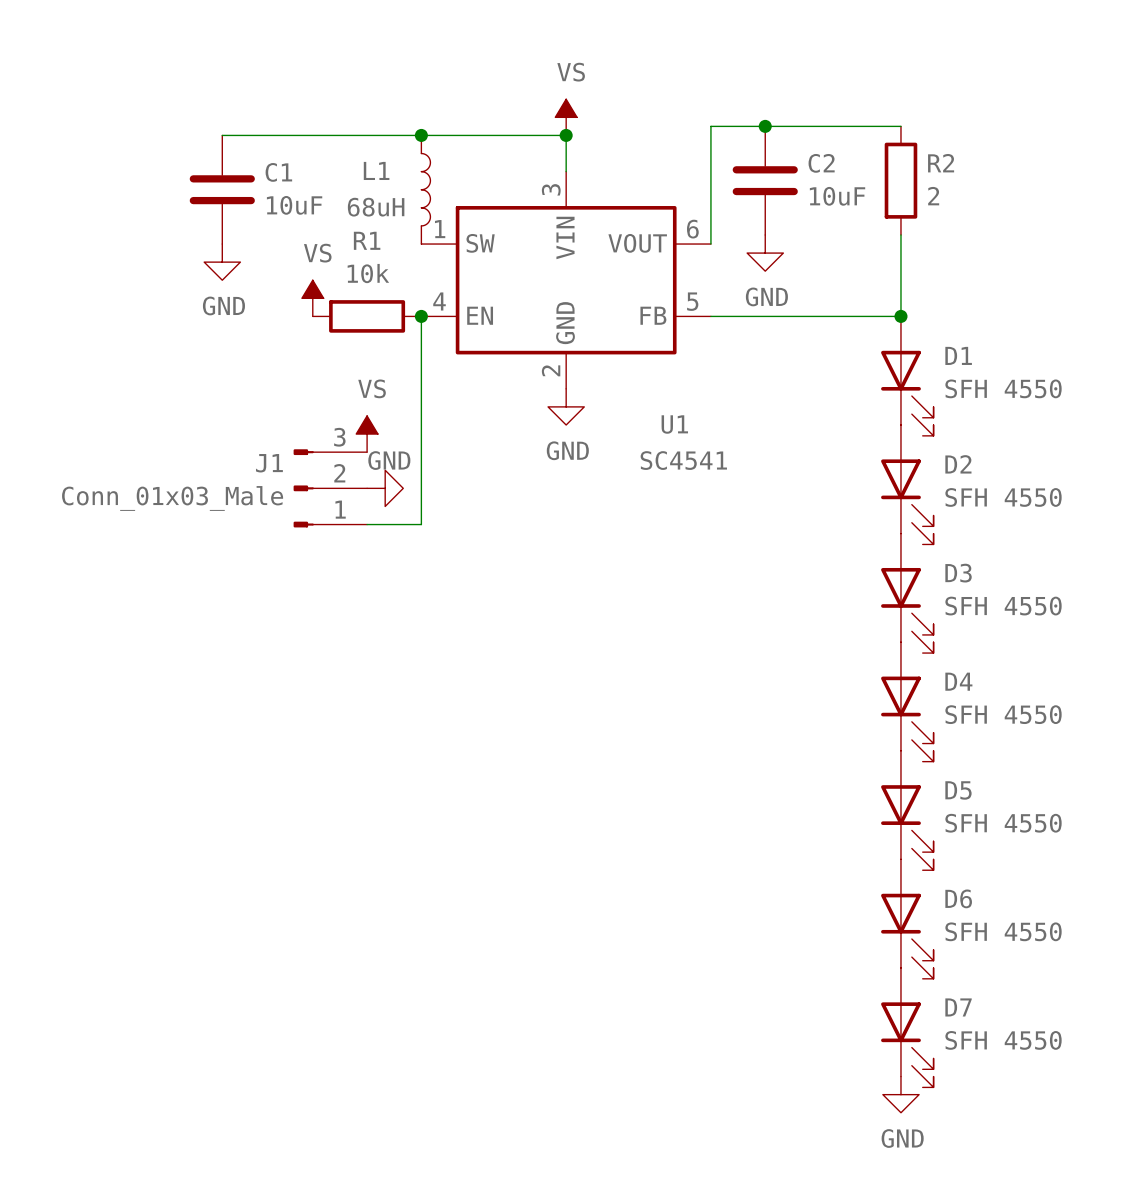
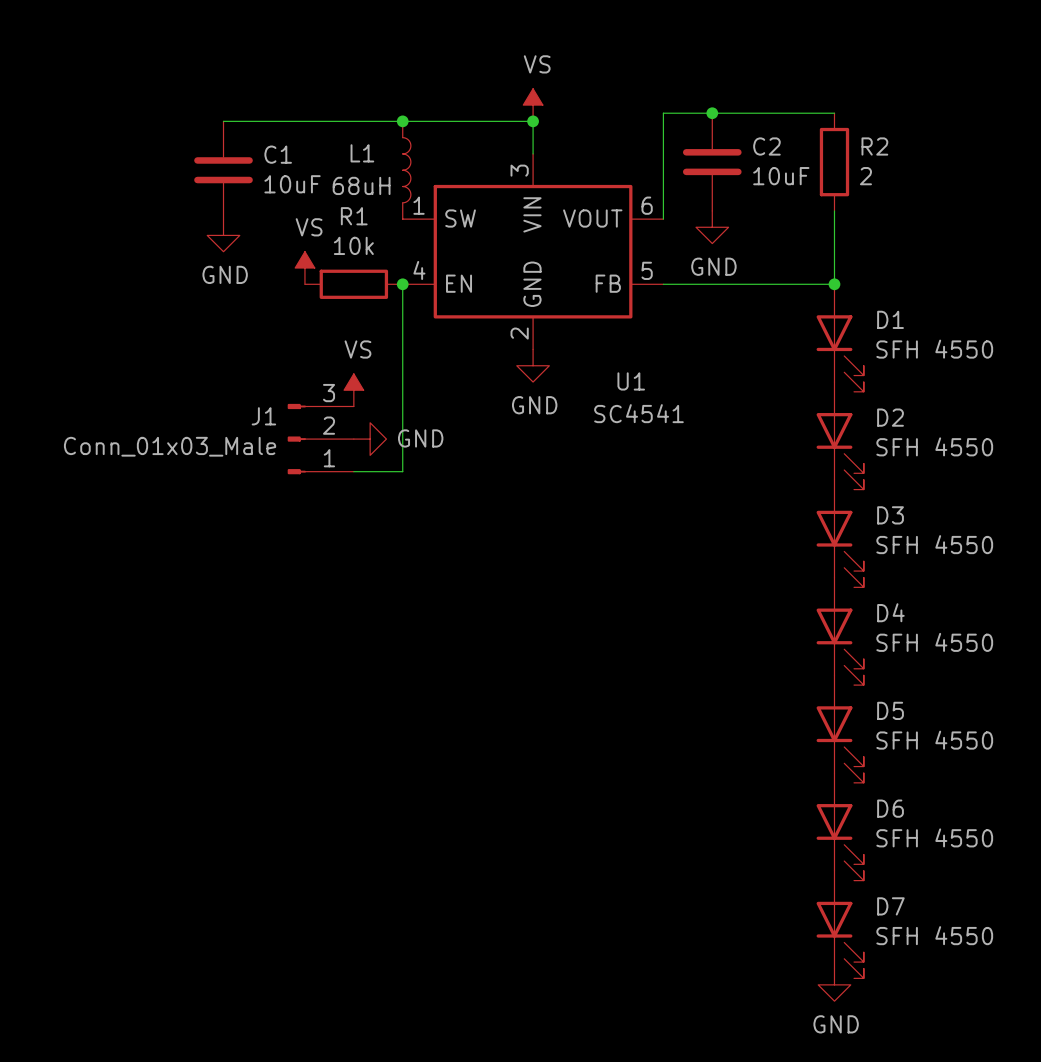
power symbol text position: GND (389, 460) -> GND (420, 438)

